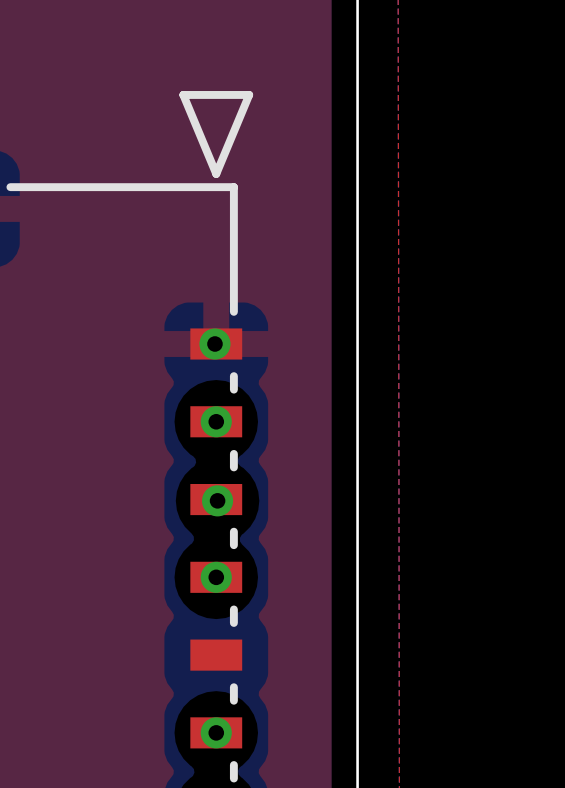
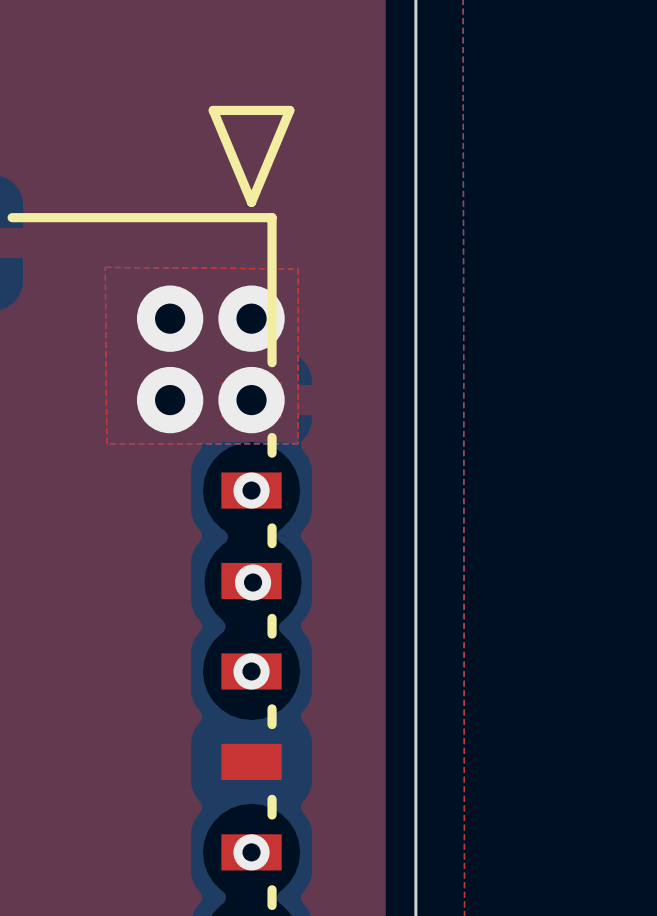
top zone outline: none -> (105, 267) (298, 268) (298, 443) (106, 443) (105, 267)
via: none -> (170, 318)
via: none -> (251, 318)
via size: [199, 328, 231, 360] -> [218, 366, 285, 434]
via: none -> (170, 400)

